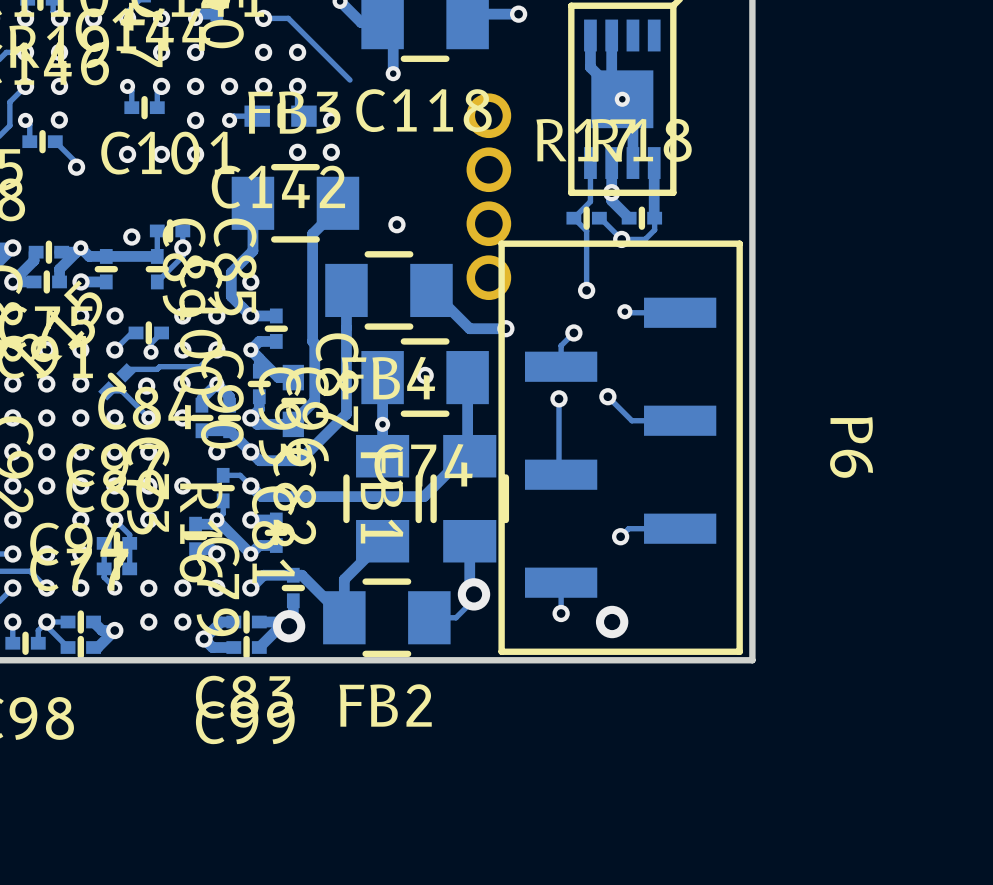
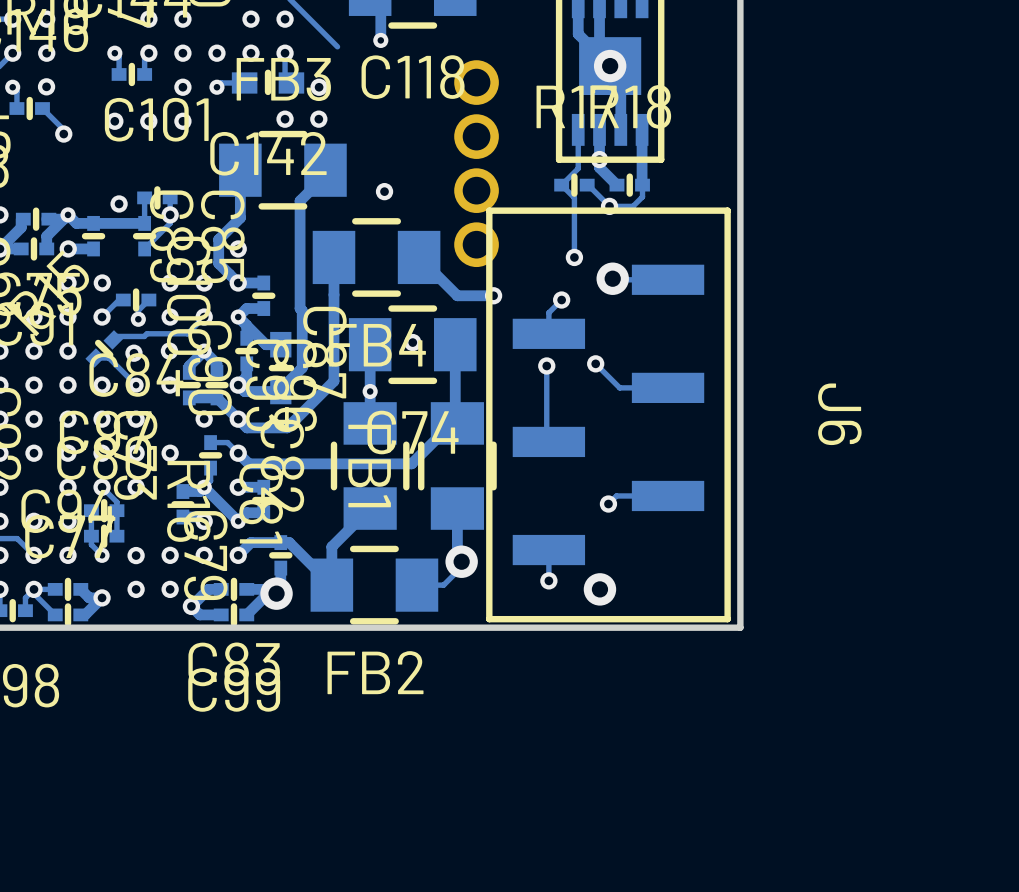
via size: [614, 91, 630, 107] -> [593, 49, 627, 83]
via size: [617, 304, 633, 320] -> [596, 262, 629, 295]
P6 name: P6 (851, 447) -> J6 (839, 414)

